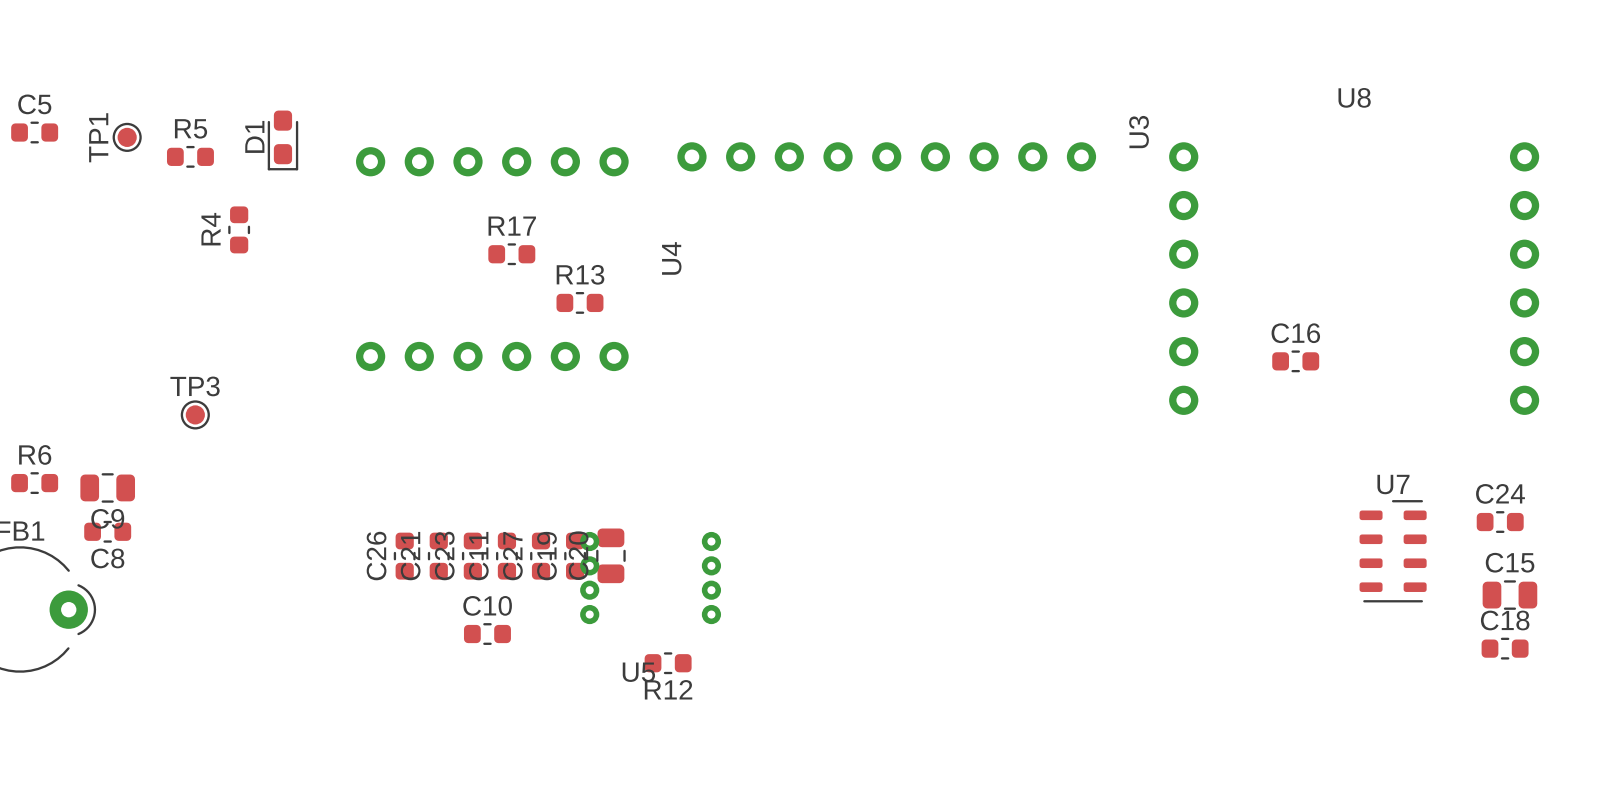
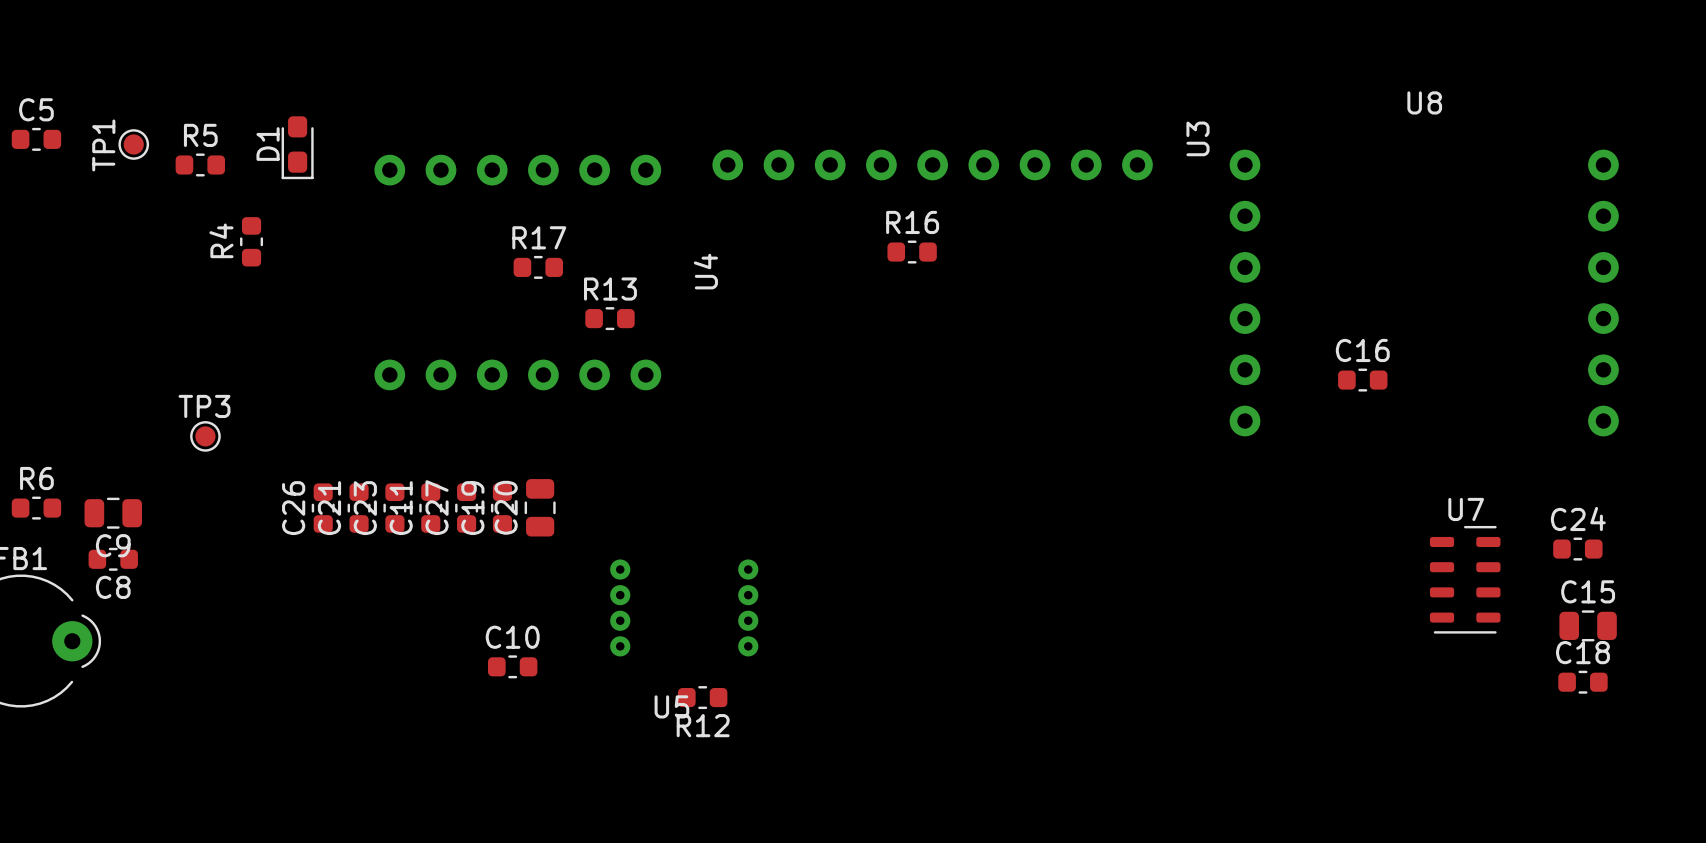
R16: none -> (912, 252)
C20 position: (610, 555) -> (540, 507)
C26 position: (404, 556) -> (323, 508)
C21 position: (438, 556) -> (359, 508)
C23 position: (472, 556) -> (394, 508)
C11 position: (506, 556) -> (430, 508)
C27 position: (541, 556) -> (466, 508)
C19 position: (575, 556) -> (502, 508)

